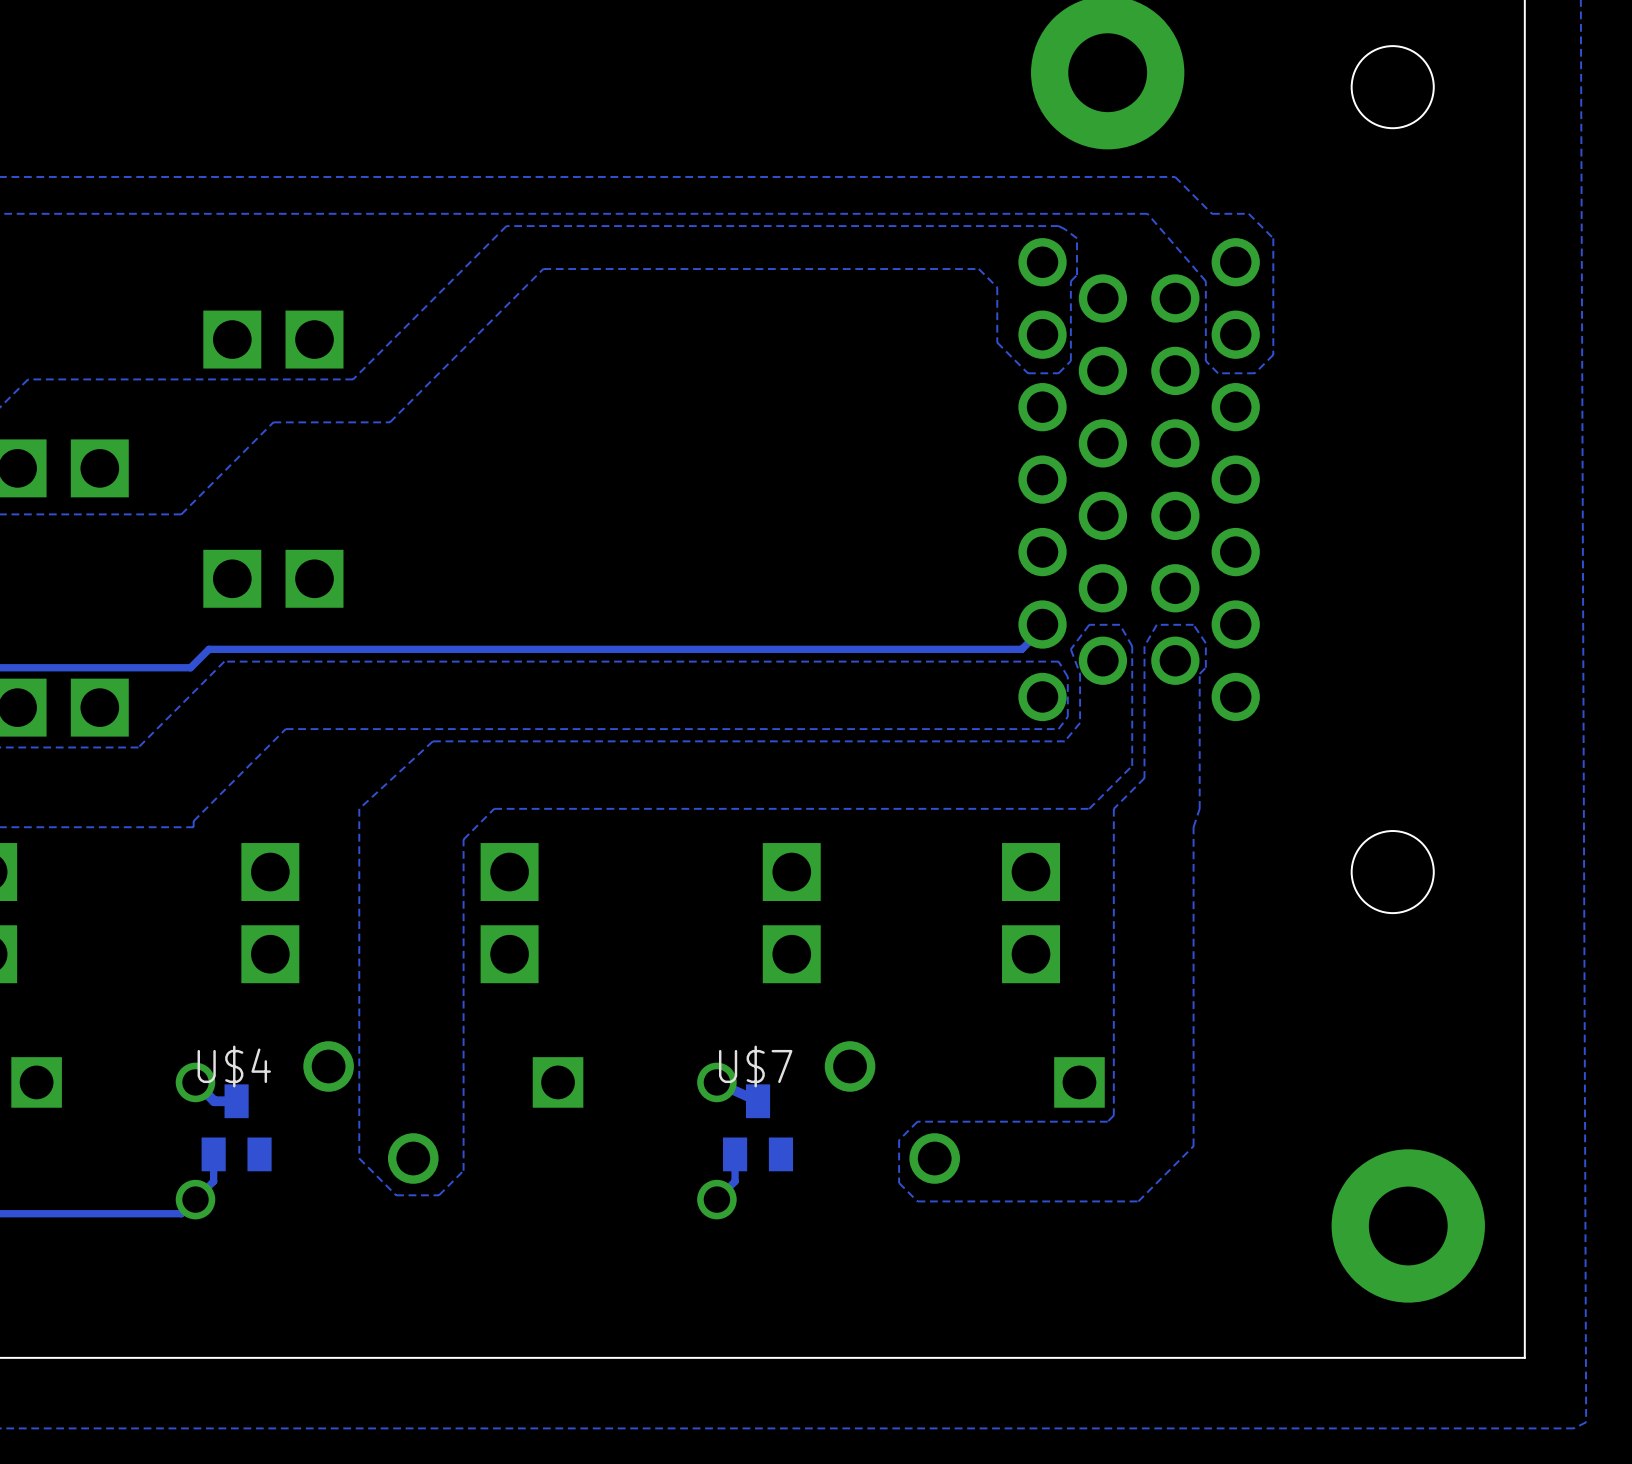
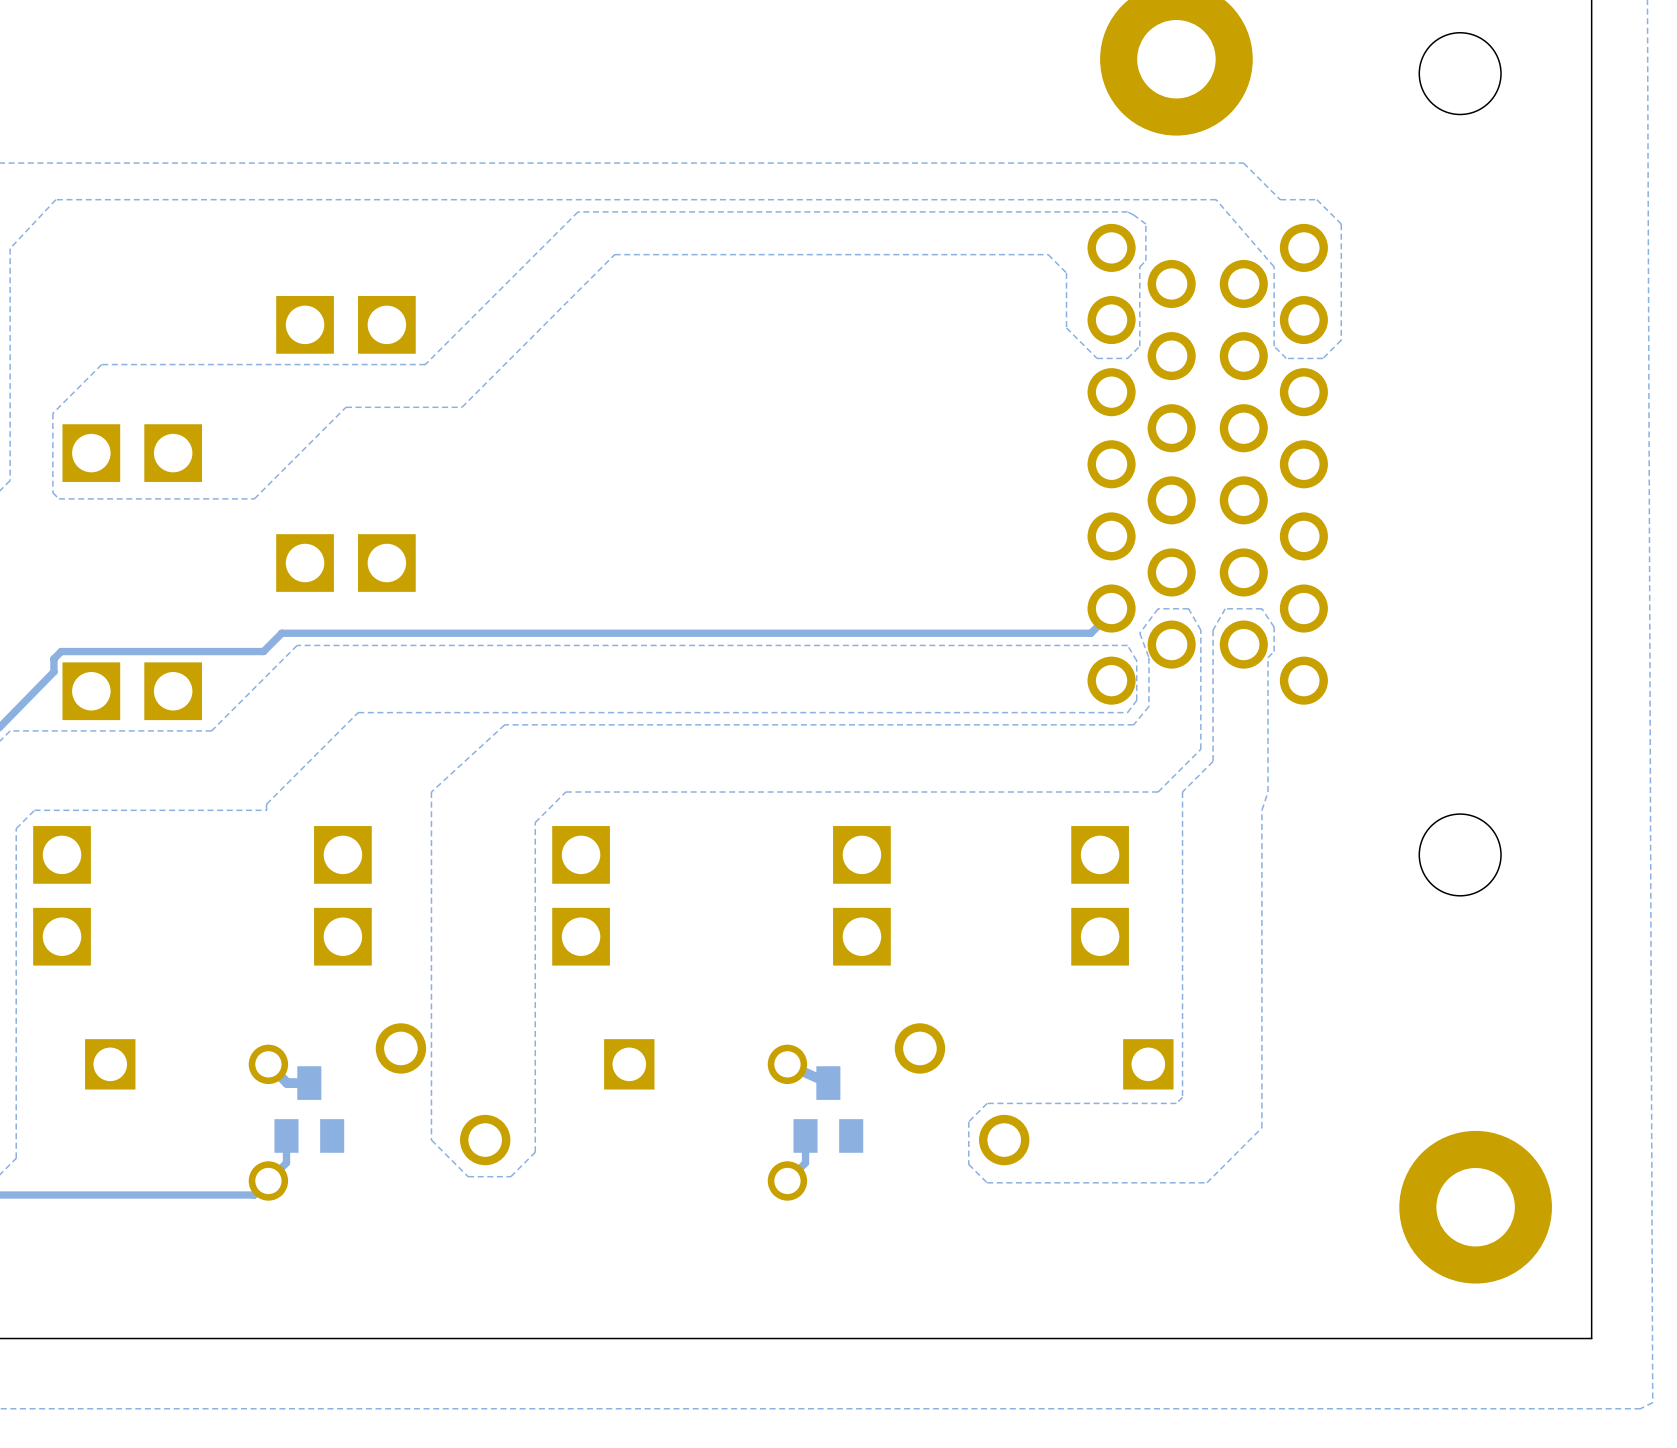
U$4 name: U$4 (234, 1066) -> none
U$7 name: U$7 (755, 1066) -> none

